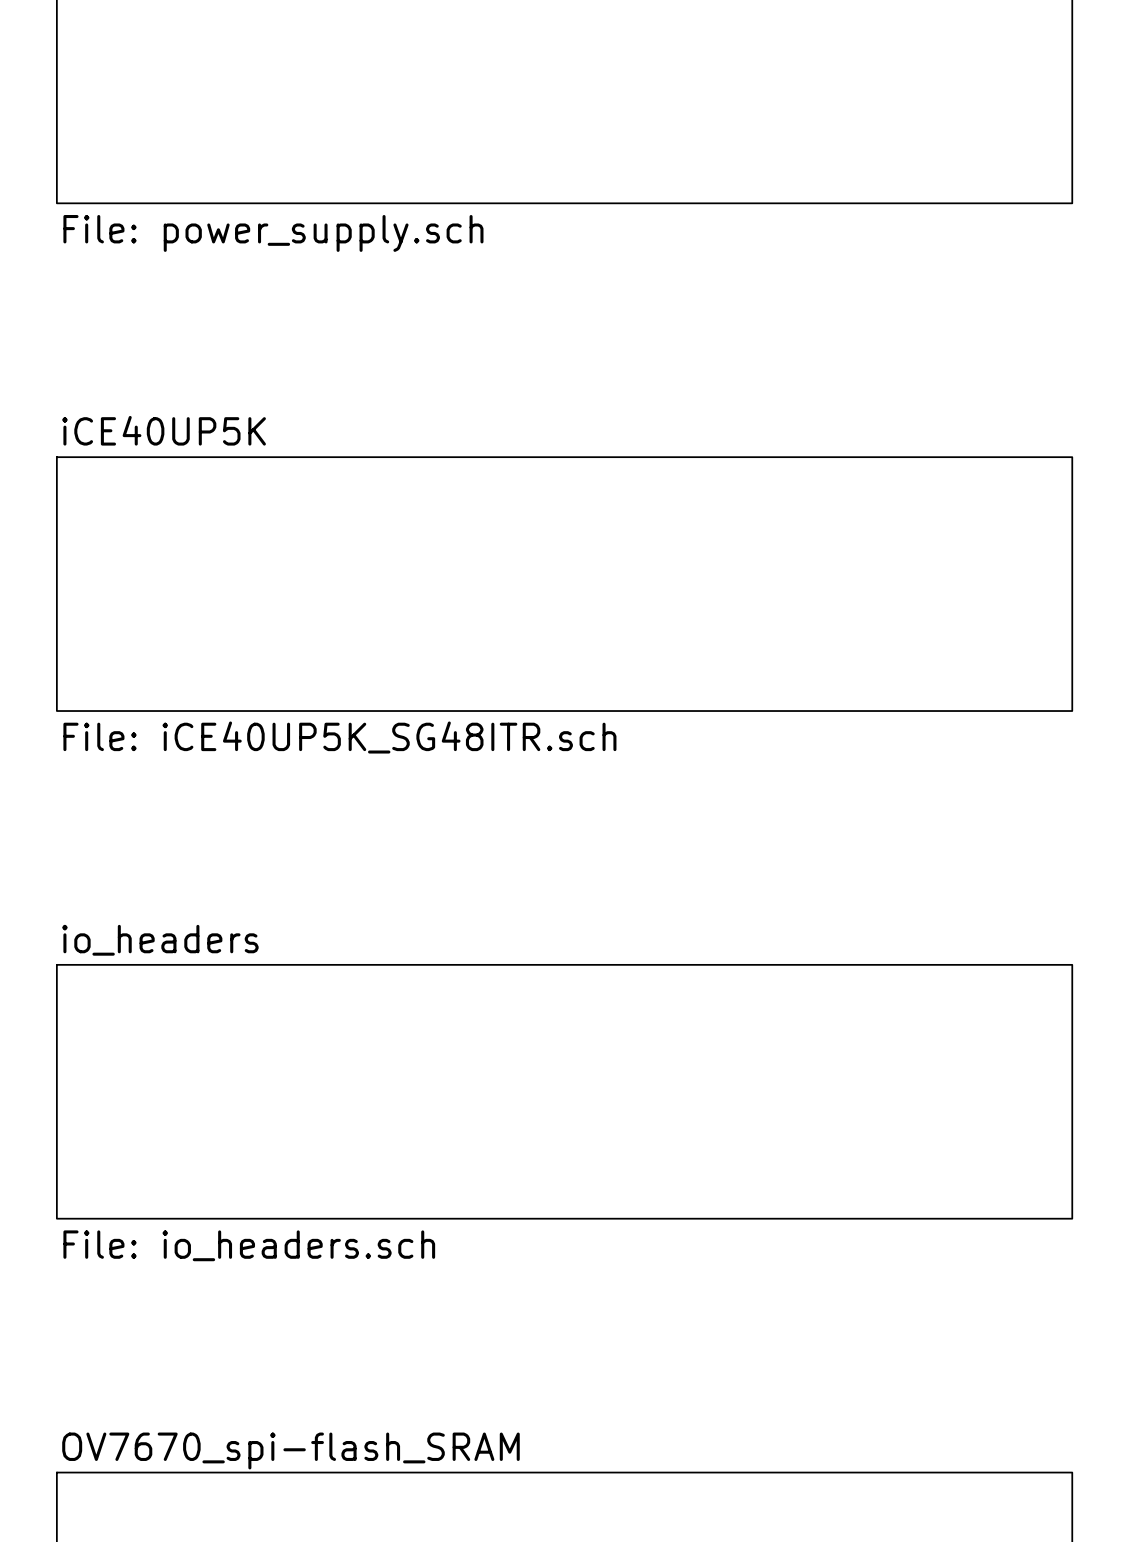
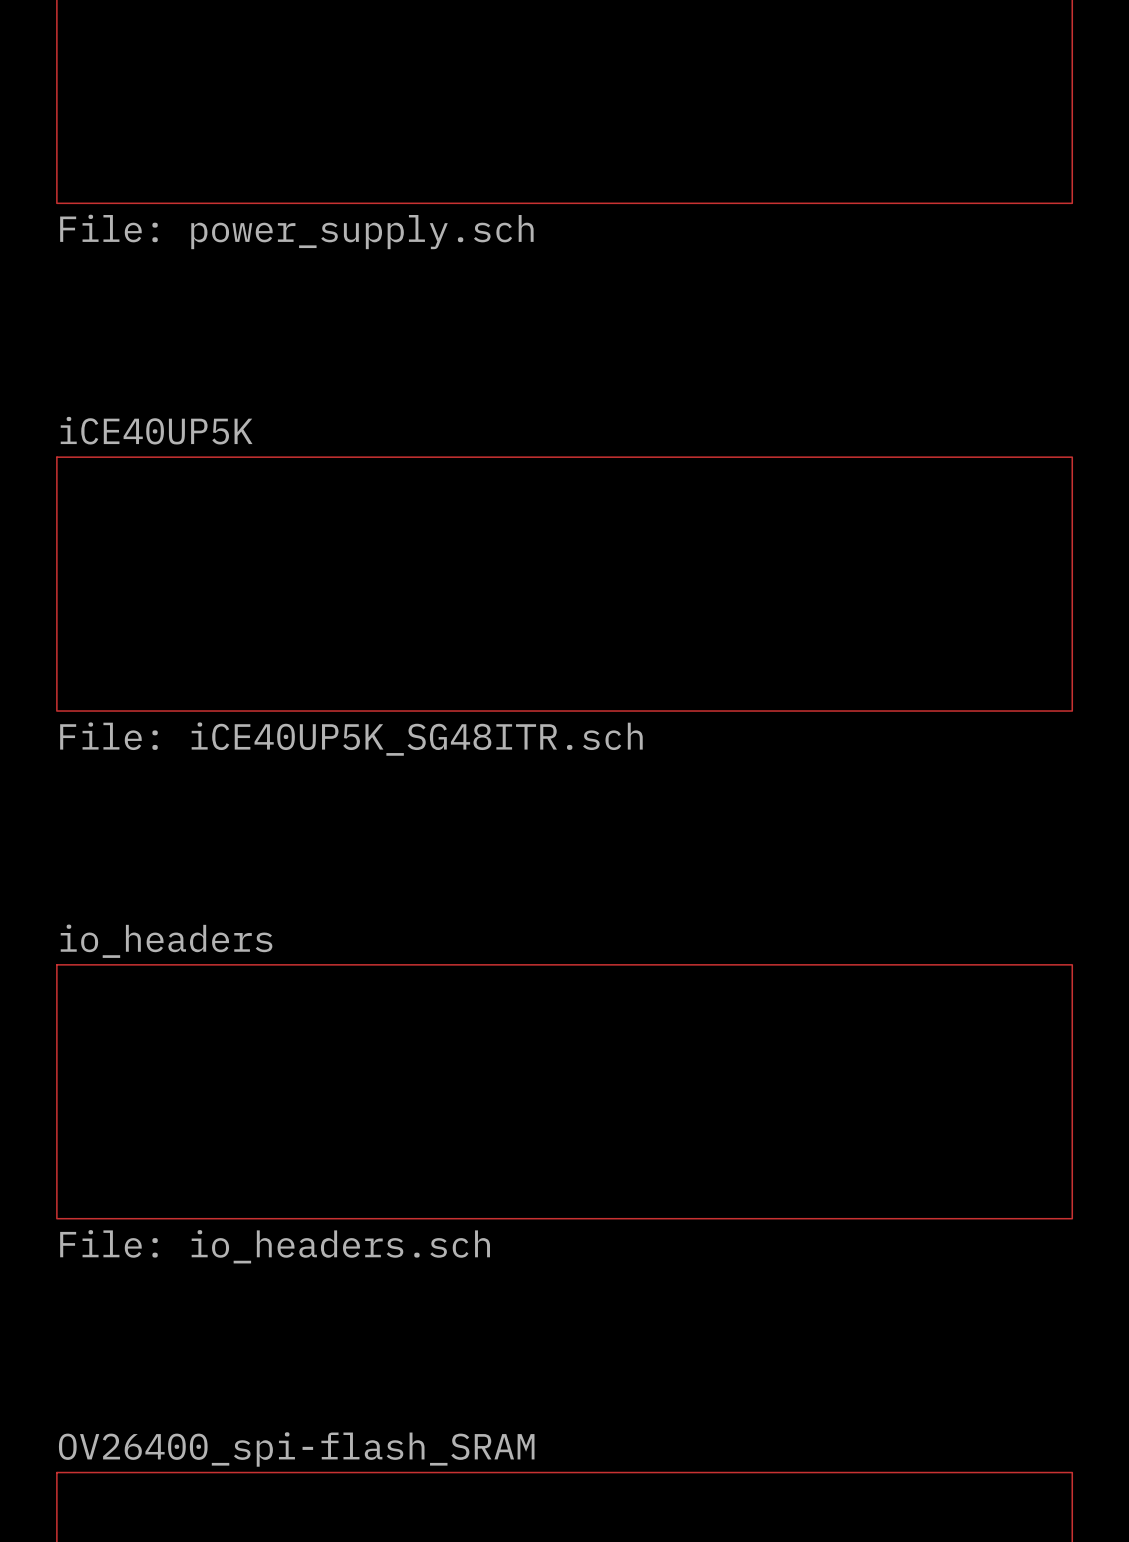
sheet OV7670_spi-flash_SRAM name: OV7670_spi-flash_SRAM (290, 1450) -> OV26400_spi-flash_SRAM (296, 1449)

